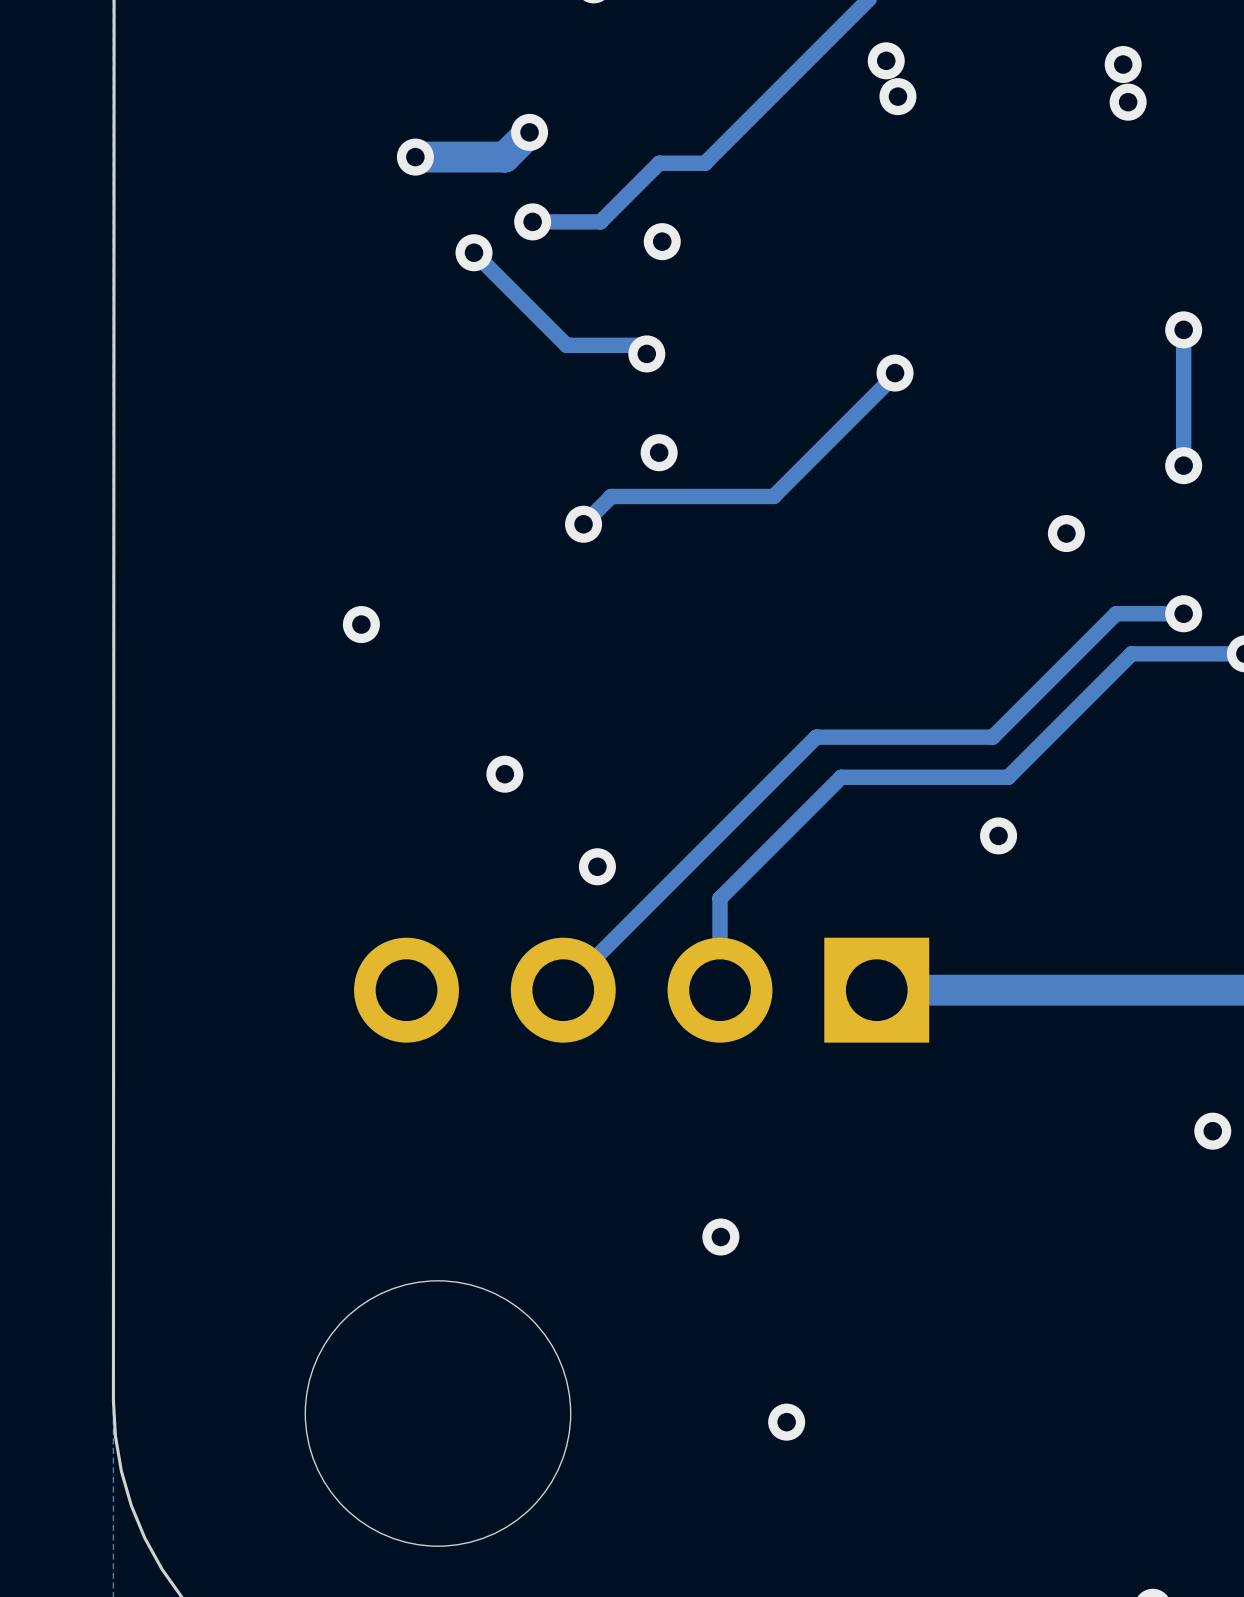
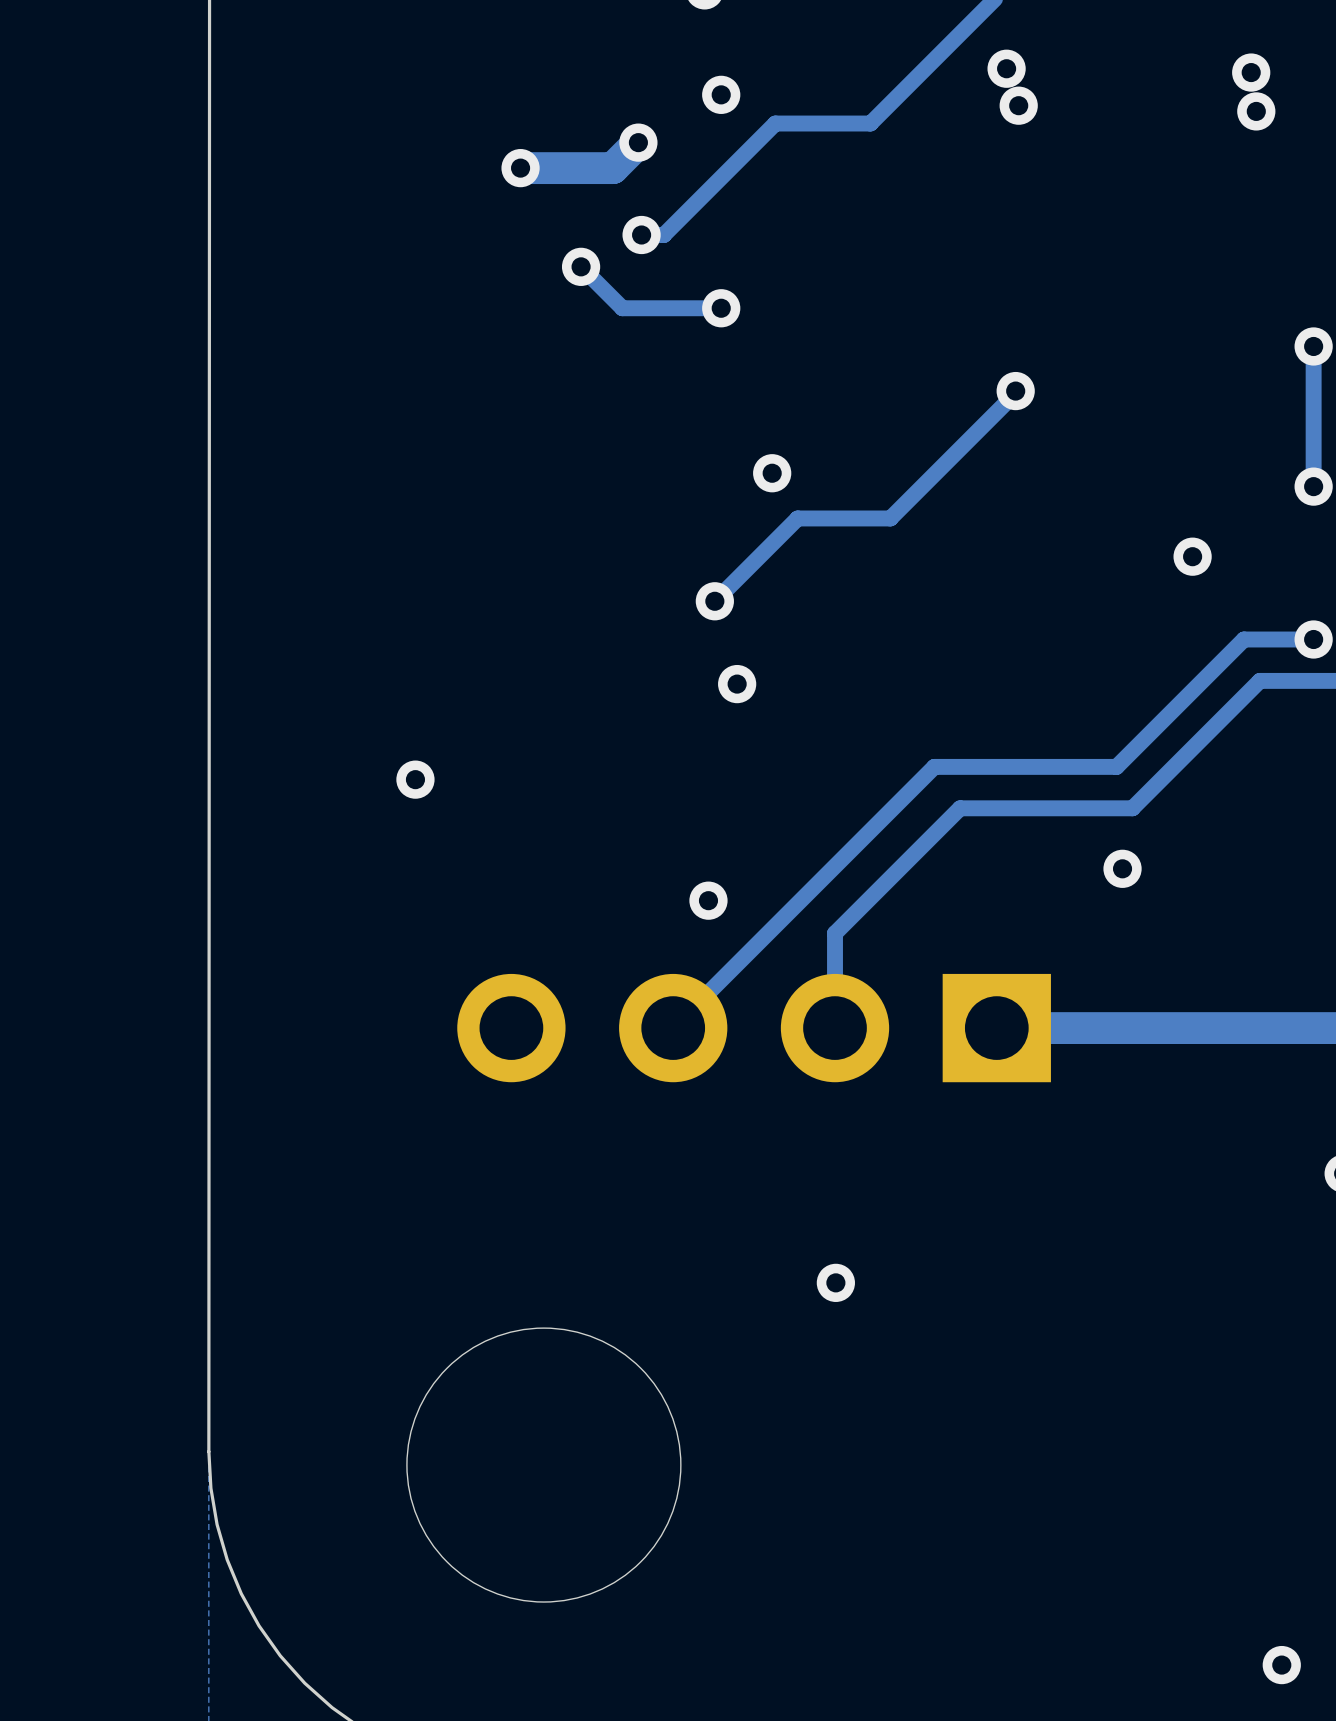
via: none -> (721, 94)
track: (754, 113) (705, 163) (659, 163) (600, 221) (554, 221) -> (870, 123) (775, 123) (663, 235)
via: (662, 241) -> none
track: (514, 292) (566, 345) (638, 345) (646, 353) -> (622, 308) (721, 308)
via: none -> (721, 308)
via: (646, 353) -> none
track: (683, 496) (611, 496) (583, 524) -> (797, 518) (714, 601)
via position: (583, 524) -> (714, 601)
via: (361, 624) -> none
via: none -> (737, 684)
via: none -> (415, 779)
via: (504, 774) -> none
via: (786, 1422) -> none

